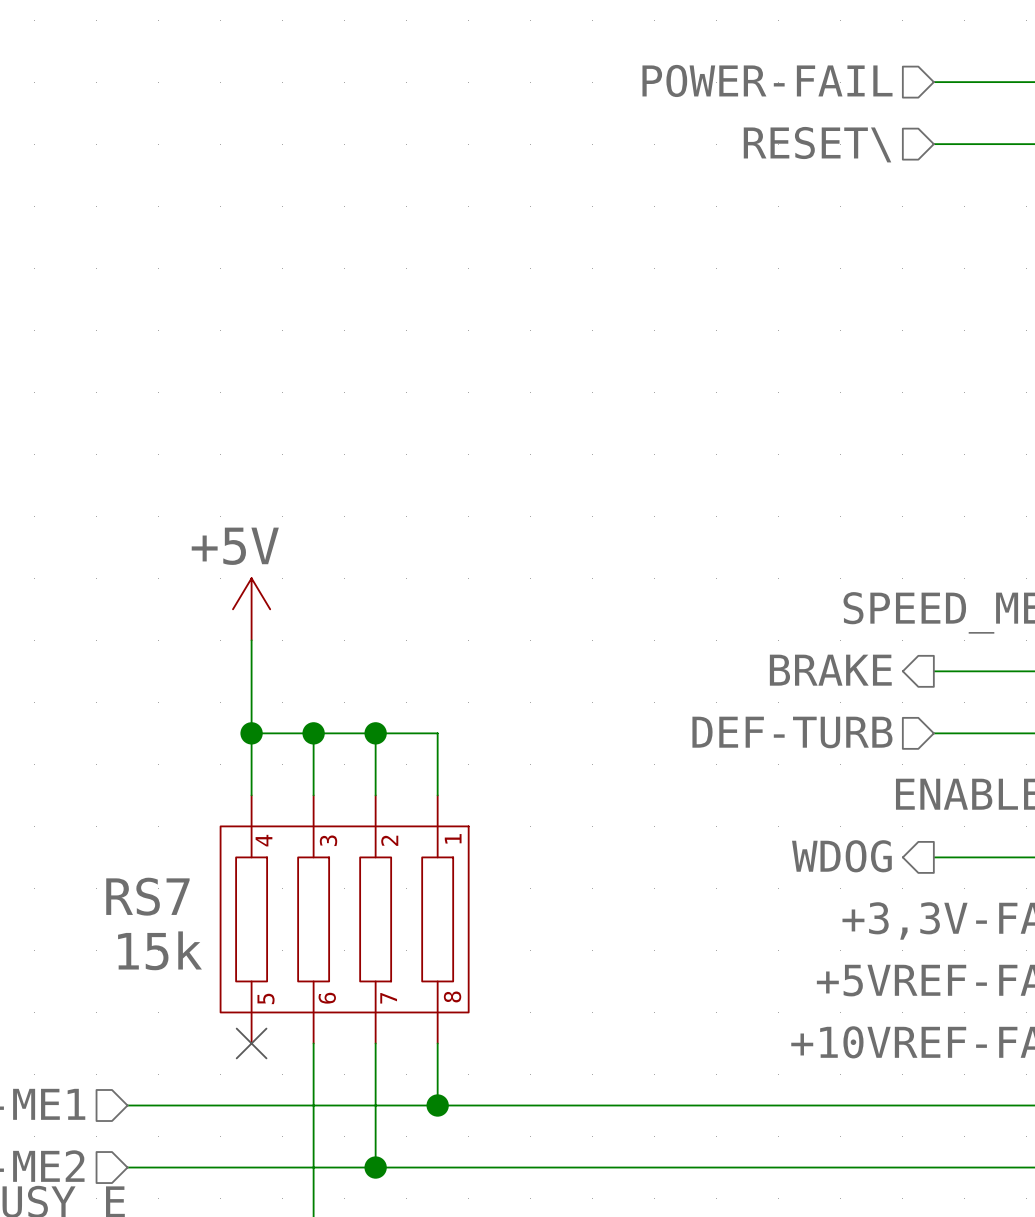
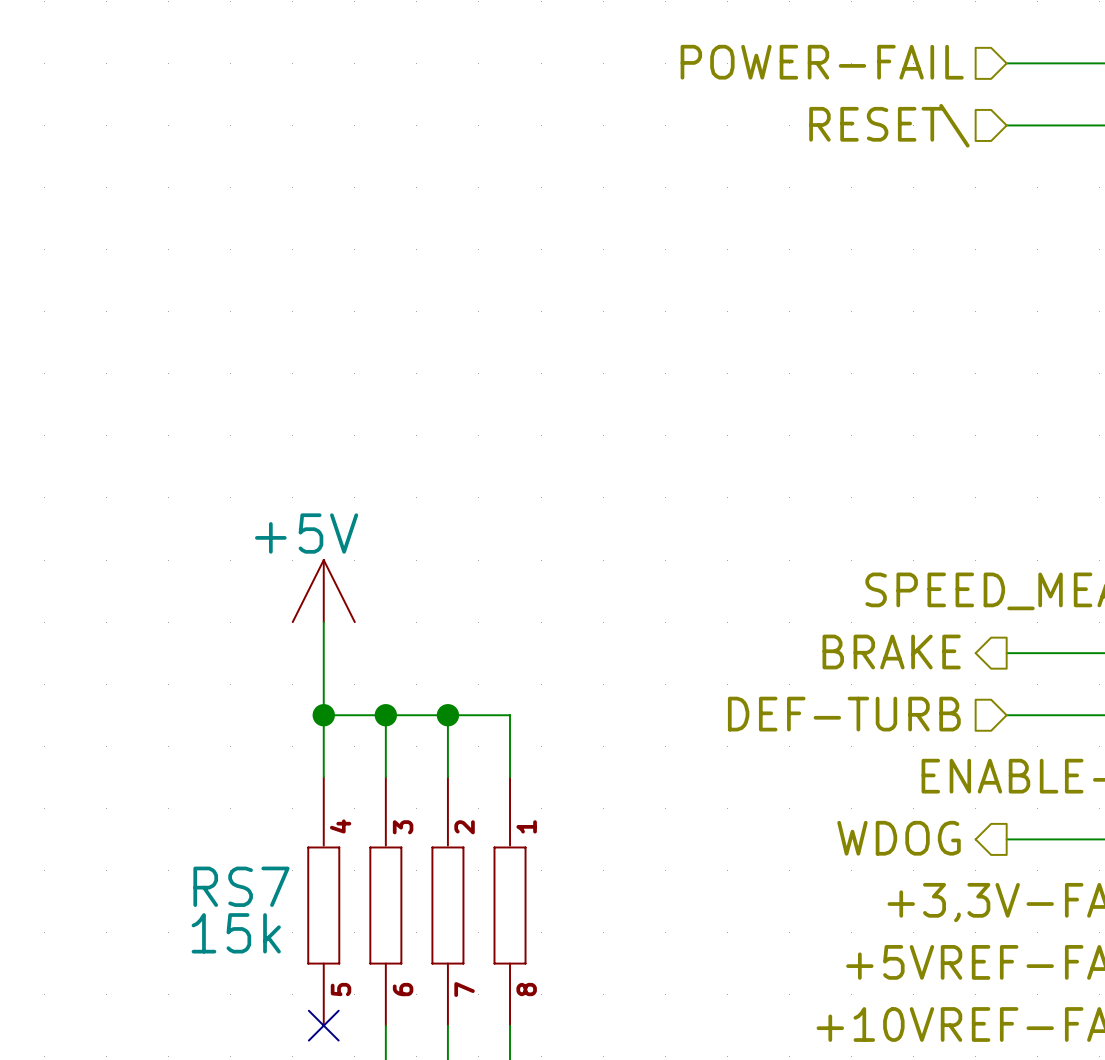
power symbol shape: [232, 578, 271, 641] -> [292, 560, 355, 623]
RS7 symbol: [220, 795, 469, 1044] -> [308, 777, 526, 1026]

